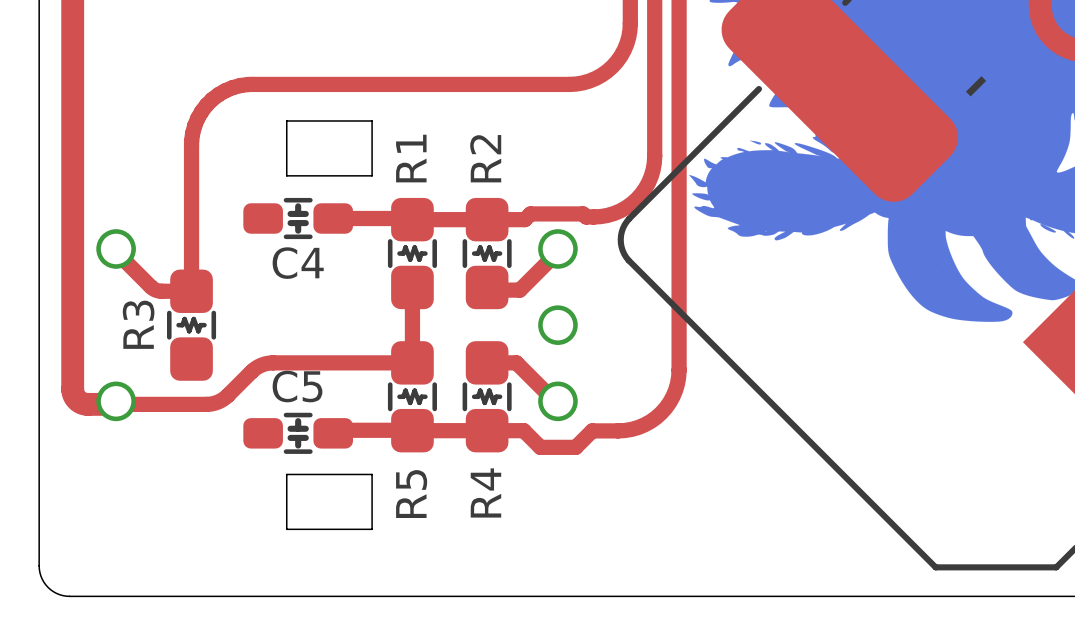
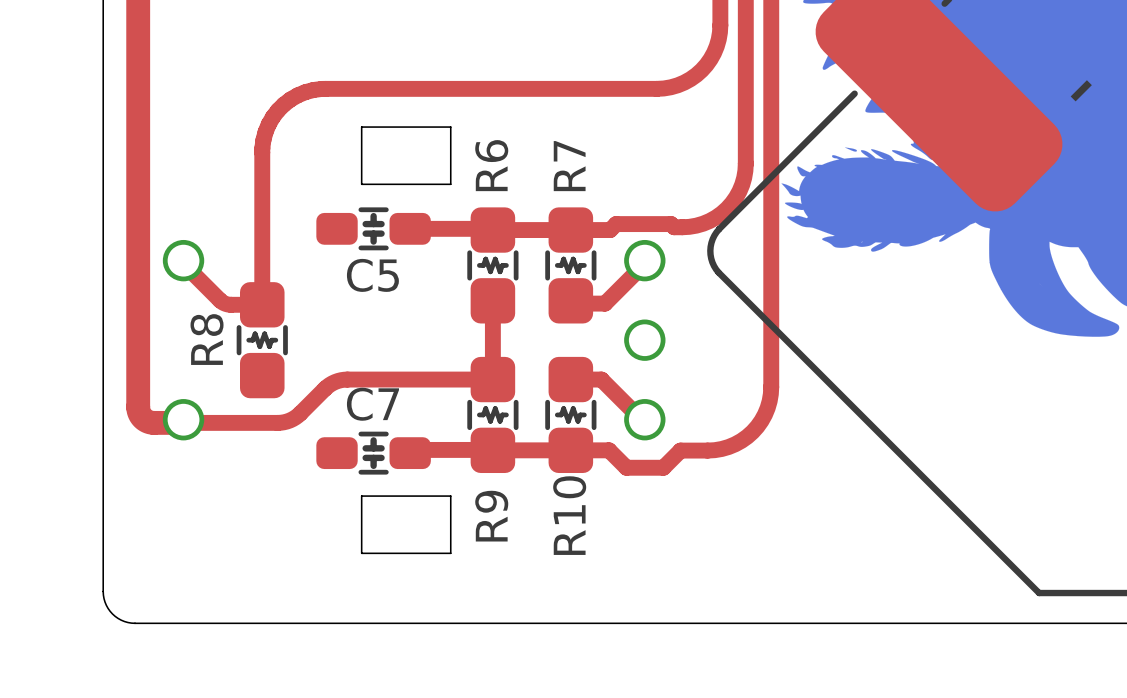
R1 name: R1 (411, 158) -> R6 (491, 165)
R2 name: R2 (485, 158) -> R7 (569, 166)
C4 name: C4 (298, 263) -> C5 (372, 275)
R3 name: R3 (138, 324) -> R8 (207, 339)
C5 name: C5 (297, 386) -> C7 (372, 404)
R4 name: R4 (485, 492) -> R10 (569, 515)
R5 name: R5 (411, 494) -> R9 (491, 516)

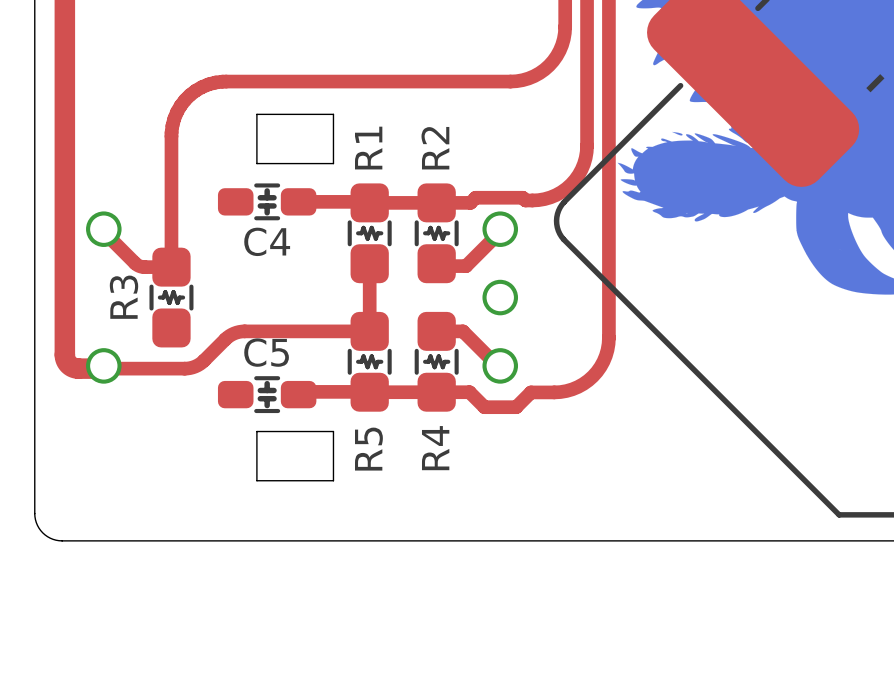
R6 name: R6 (491, 165) -> R1 (368, 148)
R7 name: R7 (569, 166) -> R2 (435, 148)
C5 name: C5 (372, 275) -> C4 (267, 241)
R8 name: R8 (207, 339) -> R3 (123, 297)
C7 name: C7 (372, 404) -> C5 (266, 352)
R10 name: R10 (569, 515) -> R4 (435, 448)
R9 name: R9 (491, 516) -> R5 (368, 449)

